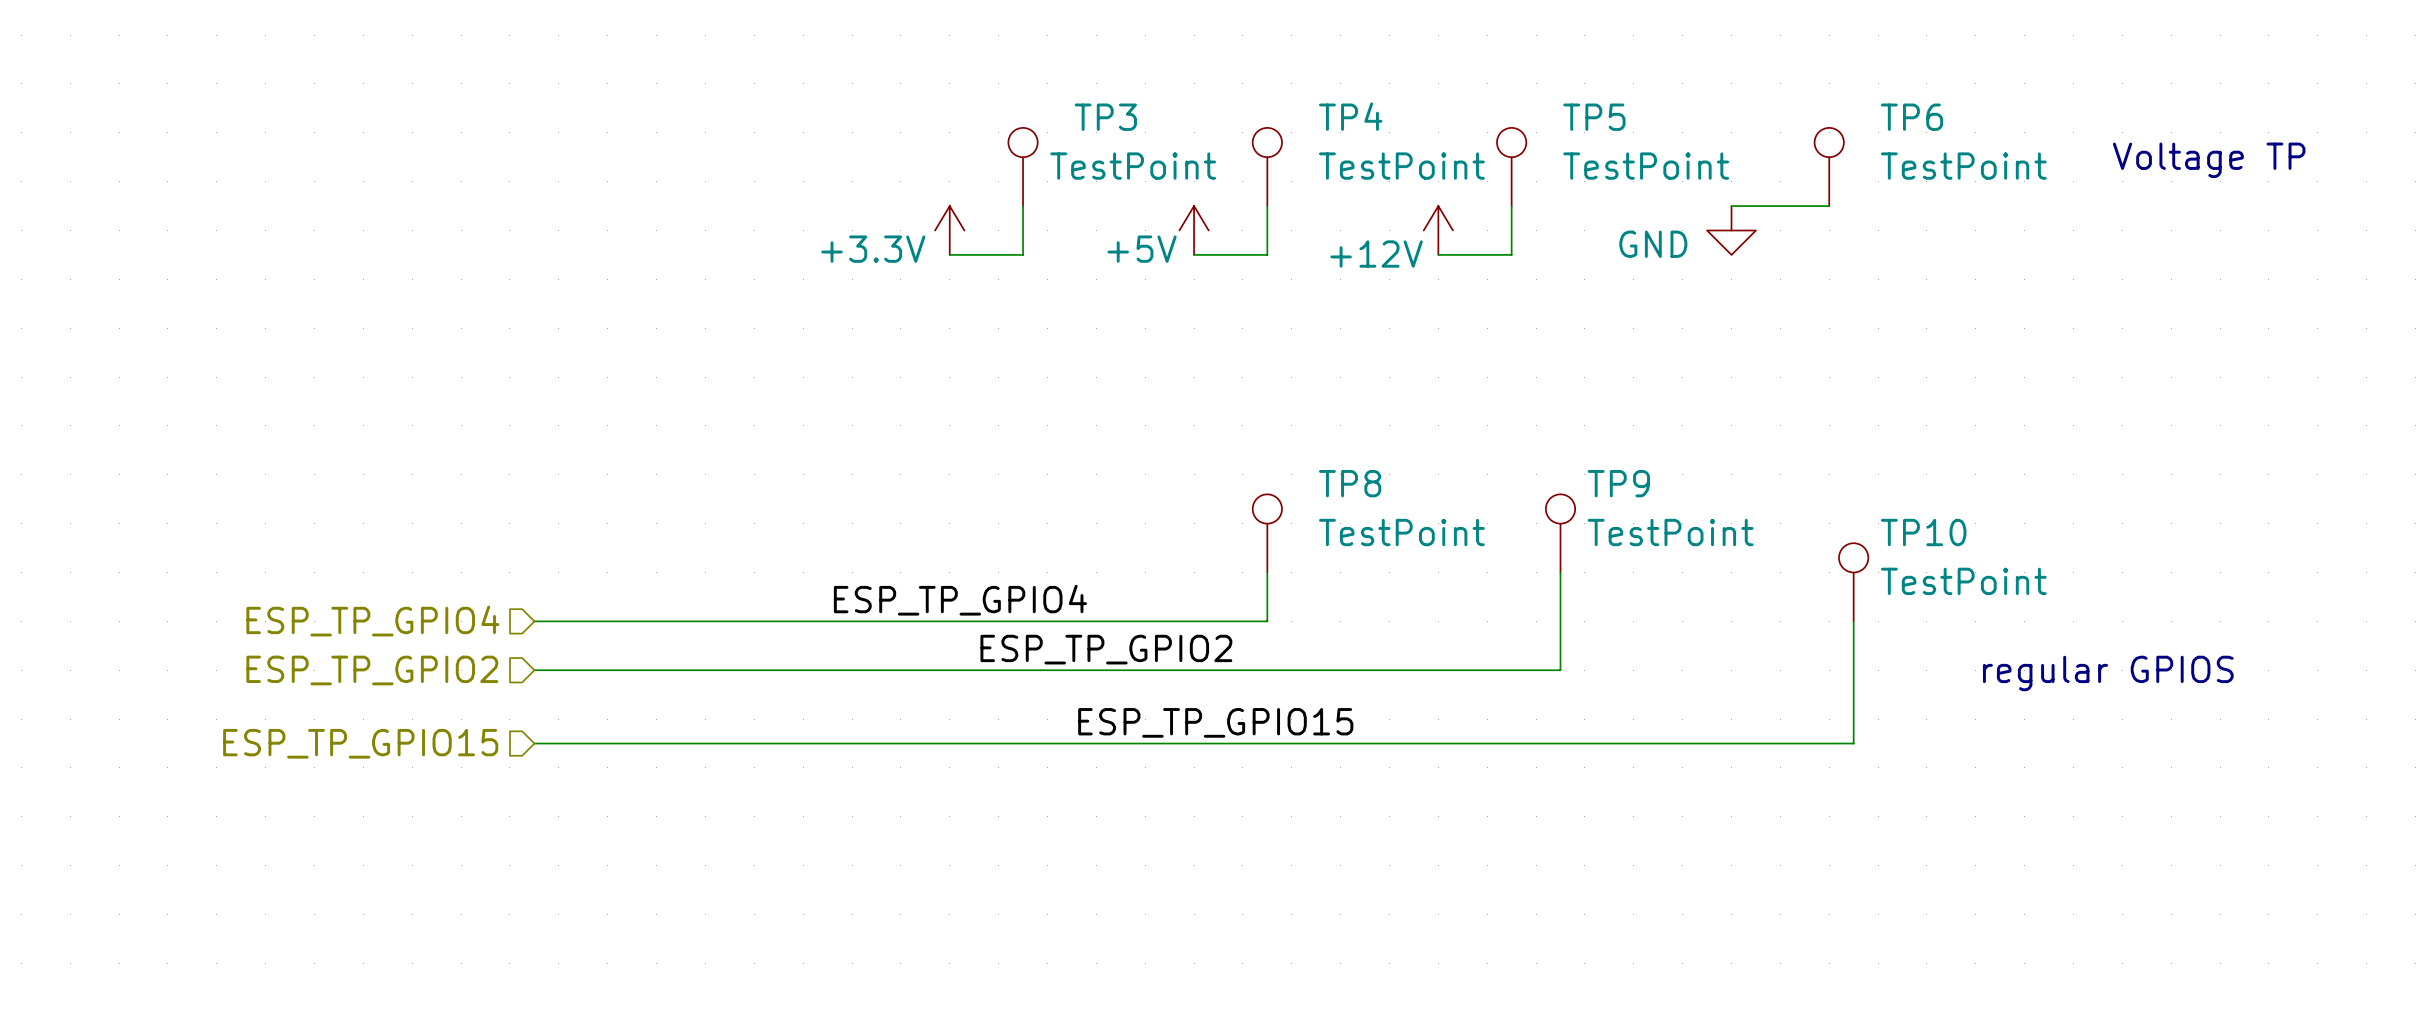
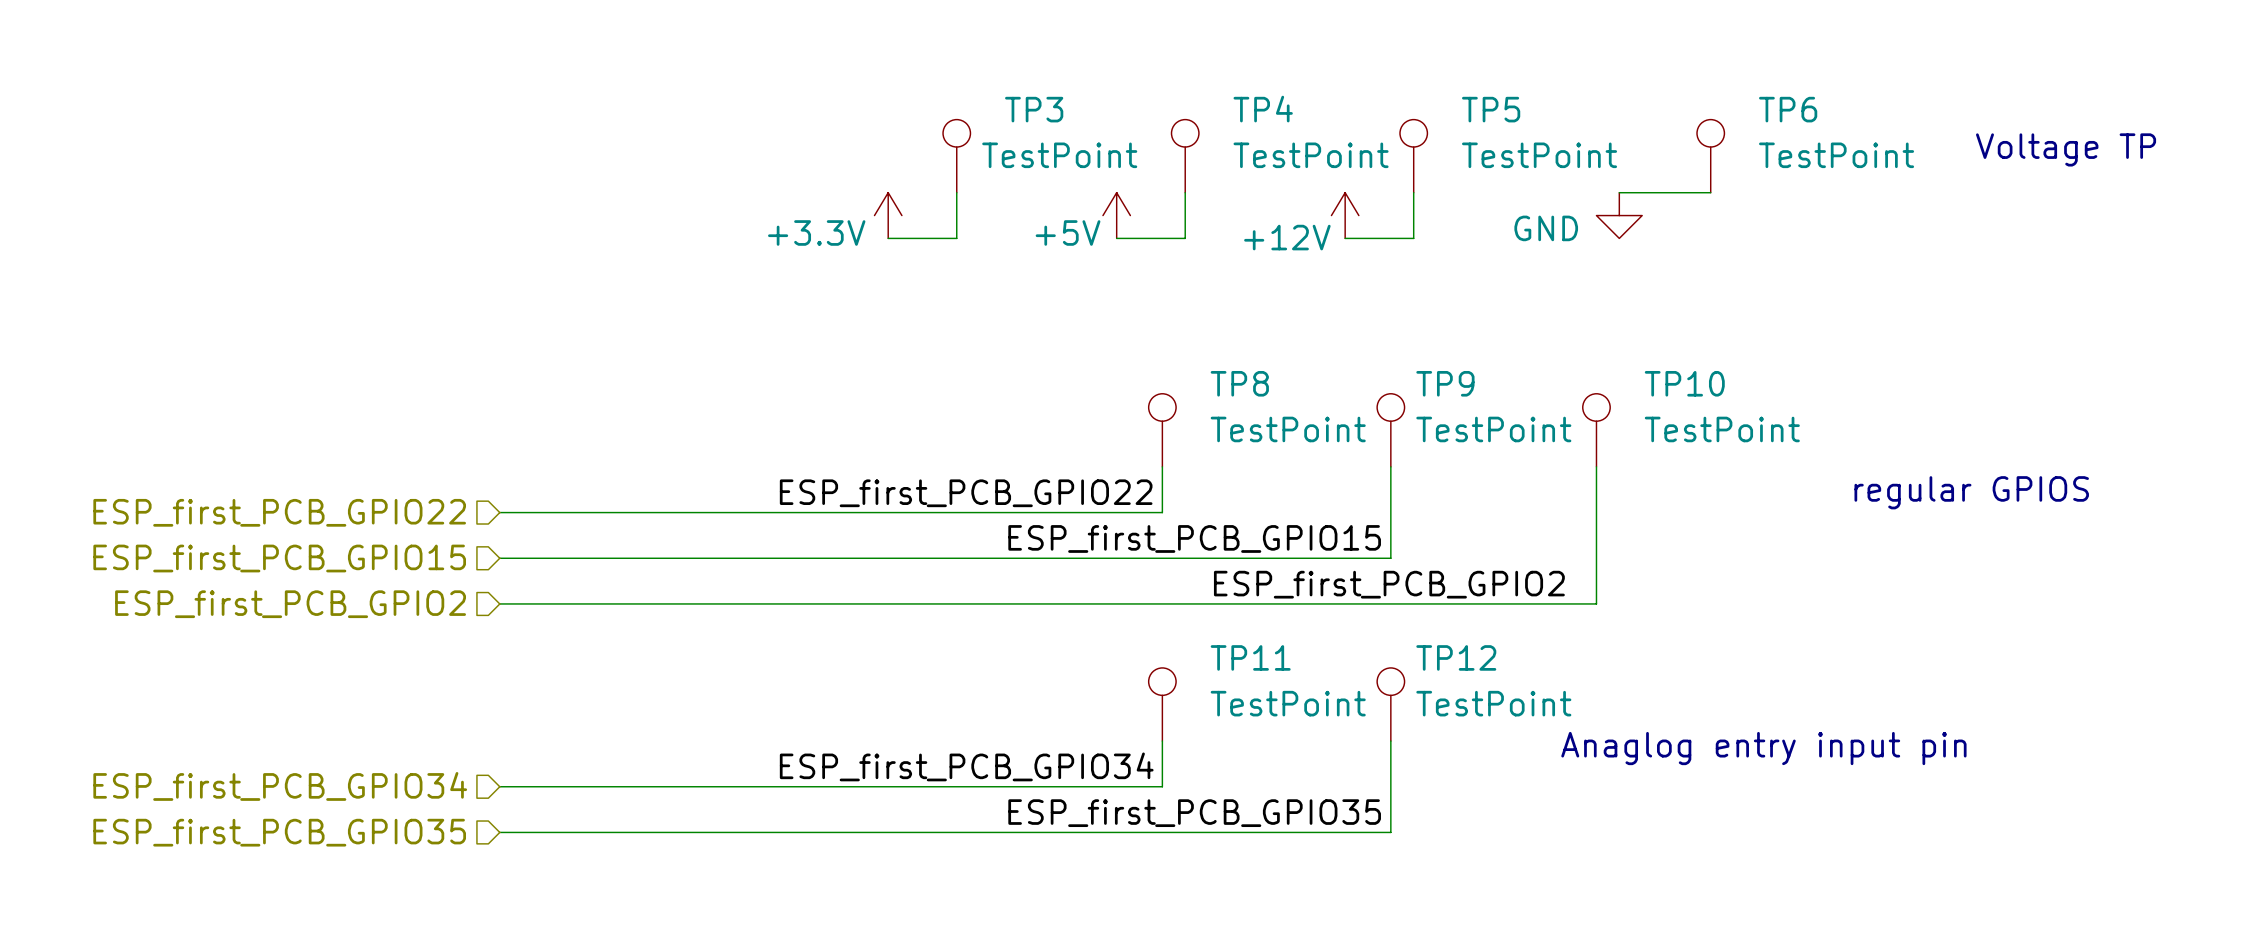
wire: none -> (1162, 466) (1162, 512) (499, 512)
wire: none -> (1390, 466) (1390, 558) (499, 558)
wire: none -> (1596, 466) (1596, 603) (499, 603)
label: none -> ESP_first_PCB_GPIO22 (966, 493)
TP10 name position: TP10 (1923, 532) -> TP10 (1684, 383)
TP8 position: (1267, 533) -> (1162, 430)
TP9 position: (1560, 533) -> (1390, 430)
hierarchical label: none -> ESP_first_PCB_GPIO22 (279, 512)
wire: (1267, 572) (1267, 621) (534, 621) -> none
wire: (1560, 572) (1560, 670) (534, 670) -> none
TP10 value position: TestPoint (1963, 581) -> TestPoint (1722, 429)
TP10 position: (1853, 582) -> (1596, 430)
hierarchical label: none -> ESP_first_PCB_GPIO15 (279, 558)
label: ESP_TP_GPIO4 (960, 600) -> ESP_first_PCB_GPIO15 (1194, 538)
hierarchical label: ESP_TP_GPIO4 (372, 621) -> none
wire: (1853, 621) (1853, 743) (534, 743) -> none
label: none -> ESP_first_PCB_GPIO2 (1389, 584)
hierarchical label: none -> ESP_first_PCB_GPIO2 (290, 604)
label: ESP_TP_GPIO2 (1106, 649) -> none
hierarchical label: ESP_TP_GPIO2 (372, 670) -> none
text position: regular GPIOS (2108, 673) -> regular GPIOS (1971, 492)
label: ESP_TP_GPIO15 (1215, 722) -> none
hierarchical label: ESP_TP_GPIO15 (360, 743) -> none
TP11: none -> TestPoint (1162, 704)
TP12: none -> TestPoint (1390, 704)
wire: none -> (1162, 741) (1162, 786) (499, 786)
wire: none -> (1390, 741) (1390, 832) (499, 832)
text: none -> Anaglog entry input pin (1763, 748)
label: none -> ESP_first_PCB_GPIO34 (966, 766)
hierarchical label: none -> ESP_first_PCB_GPIO34 (280, 786)
label: none -> ESP_first_PCB_GPIO35 (1194, 813)
hierarchical label: none -> ESP_first_PCB_GPIO35 (279, 832)

